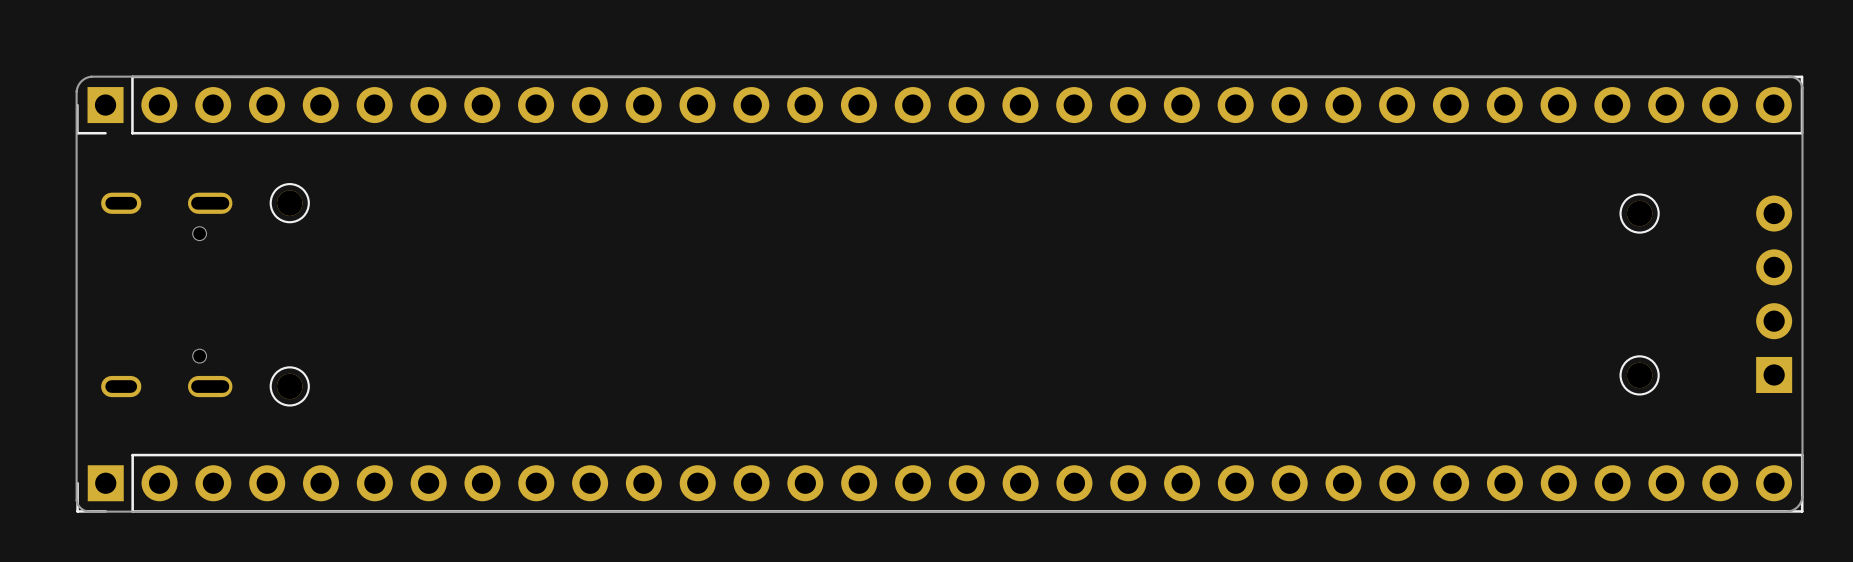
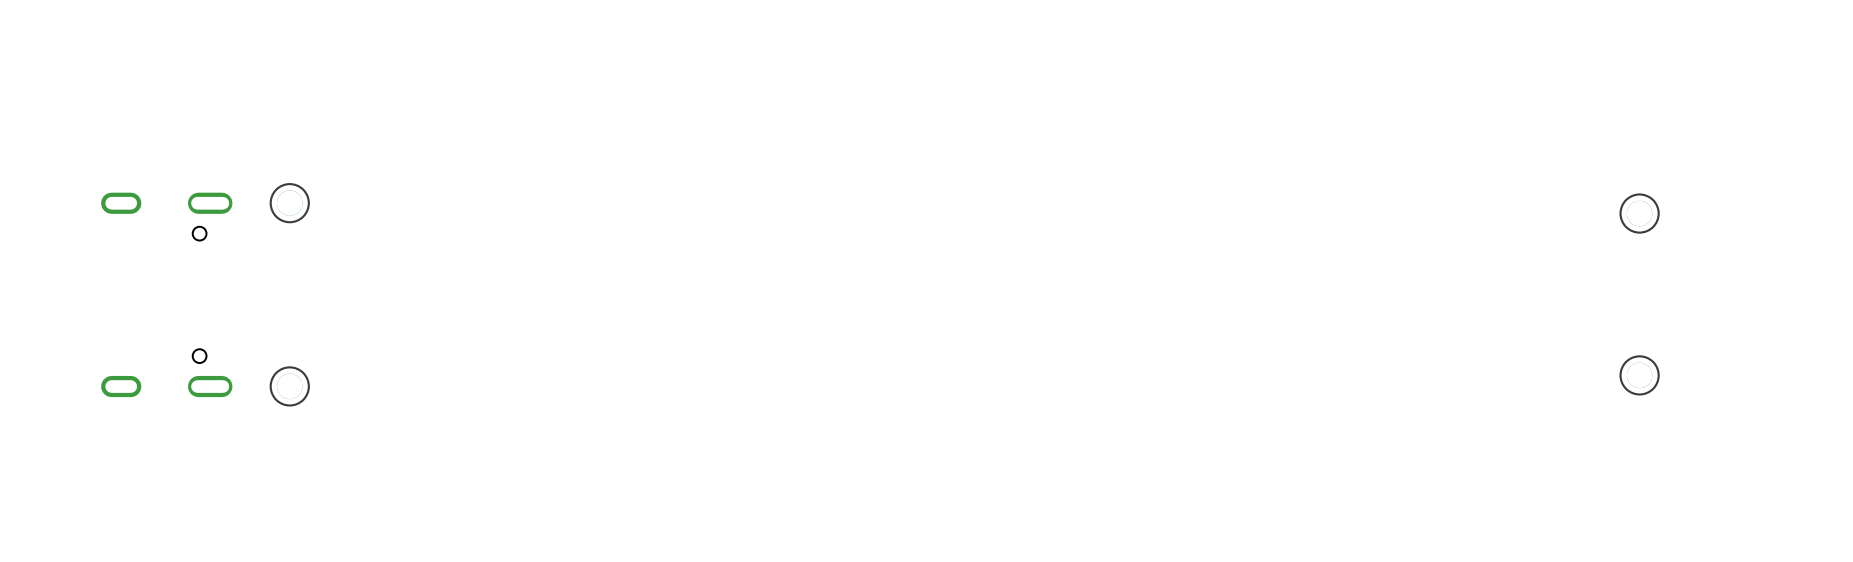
board edge: (1789, 76) (89, 76) (81, 81) (76, 91) (76, 501) (80, 508) (89, 511) (1789, 511) (1798, 505) (1802, 496) (1802, 87) (1798, 79) (1789, 76) -> none
part: (939, 105) -> none
part: (1774, 294) -> none
part: (939, 483) -> none

